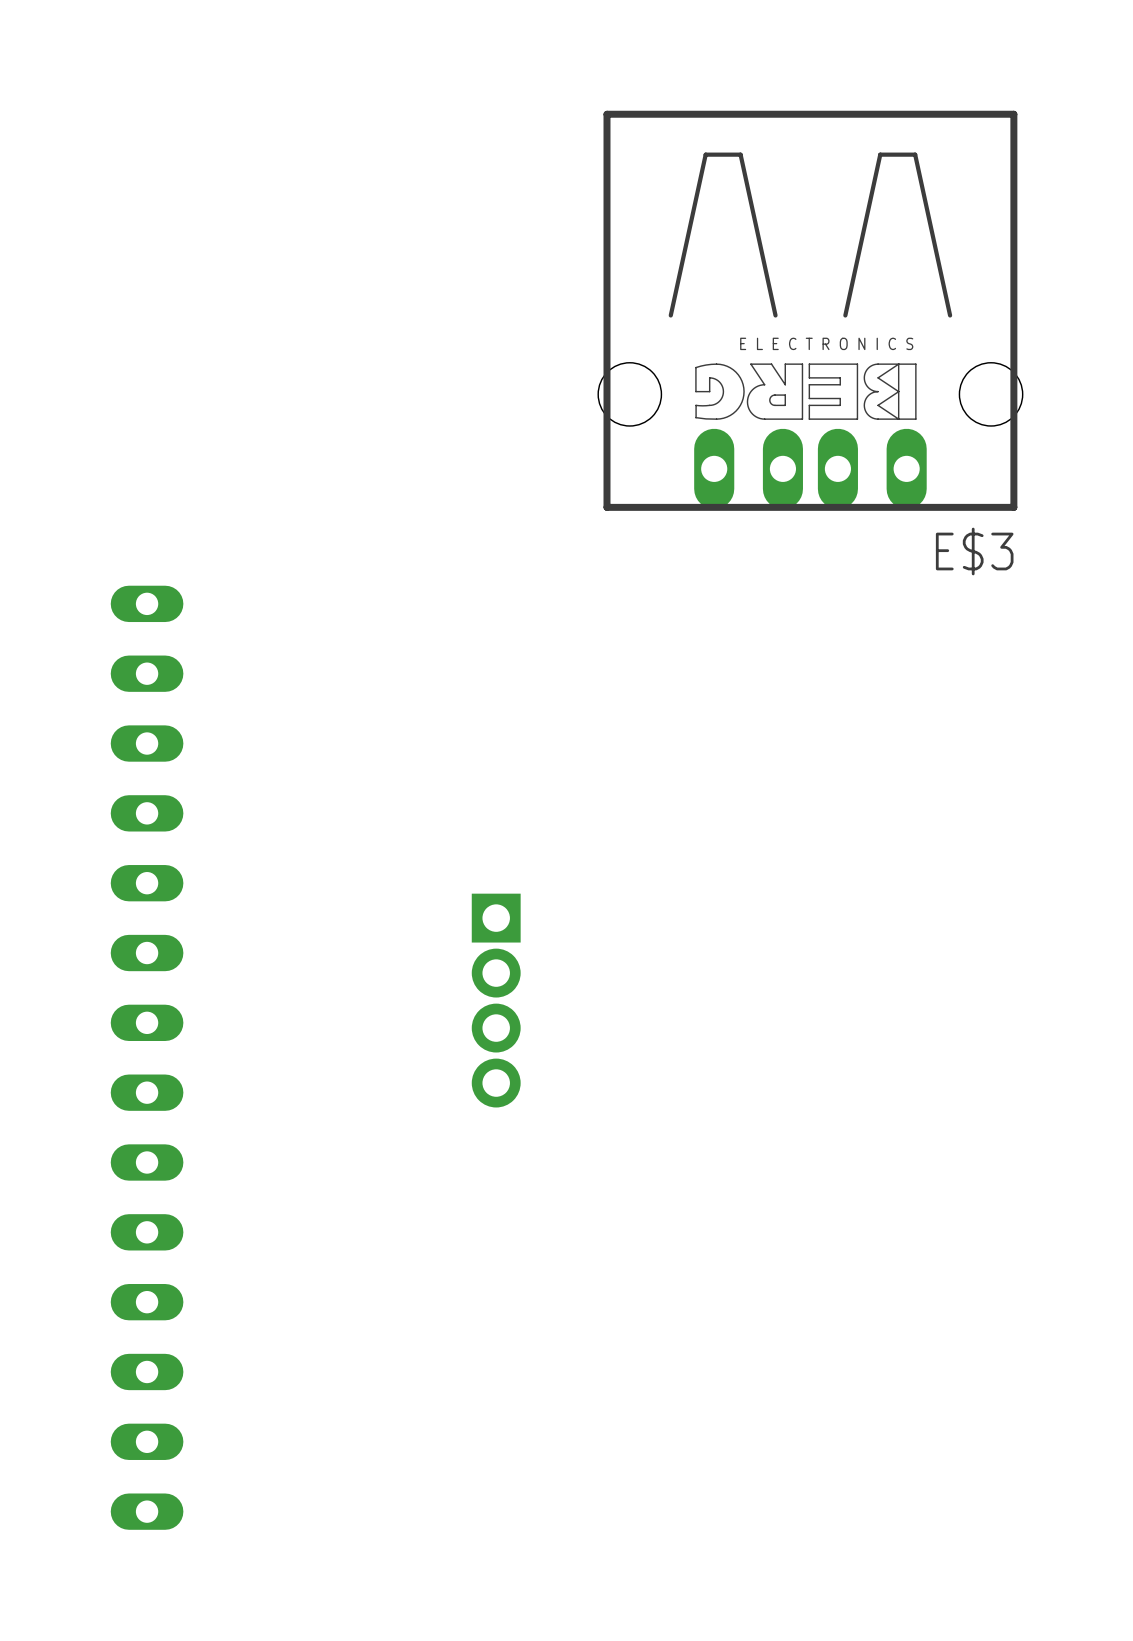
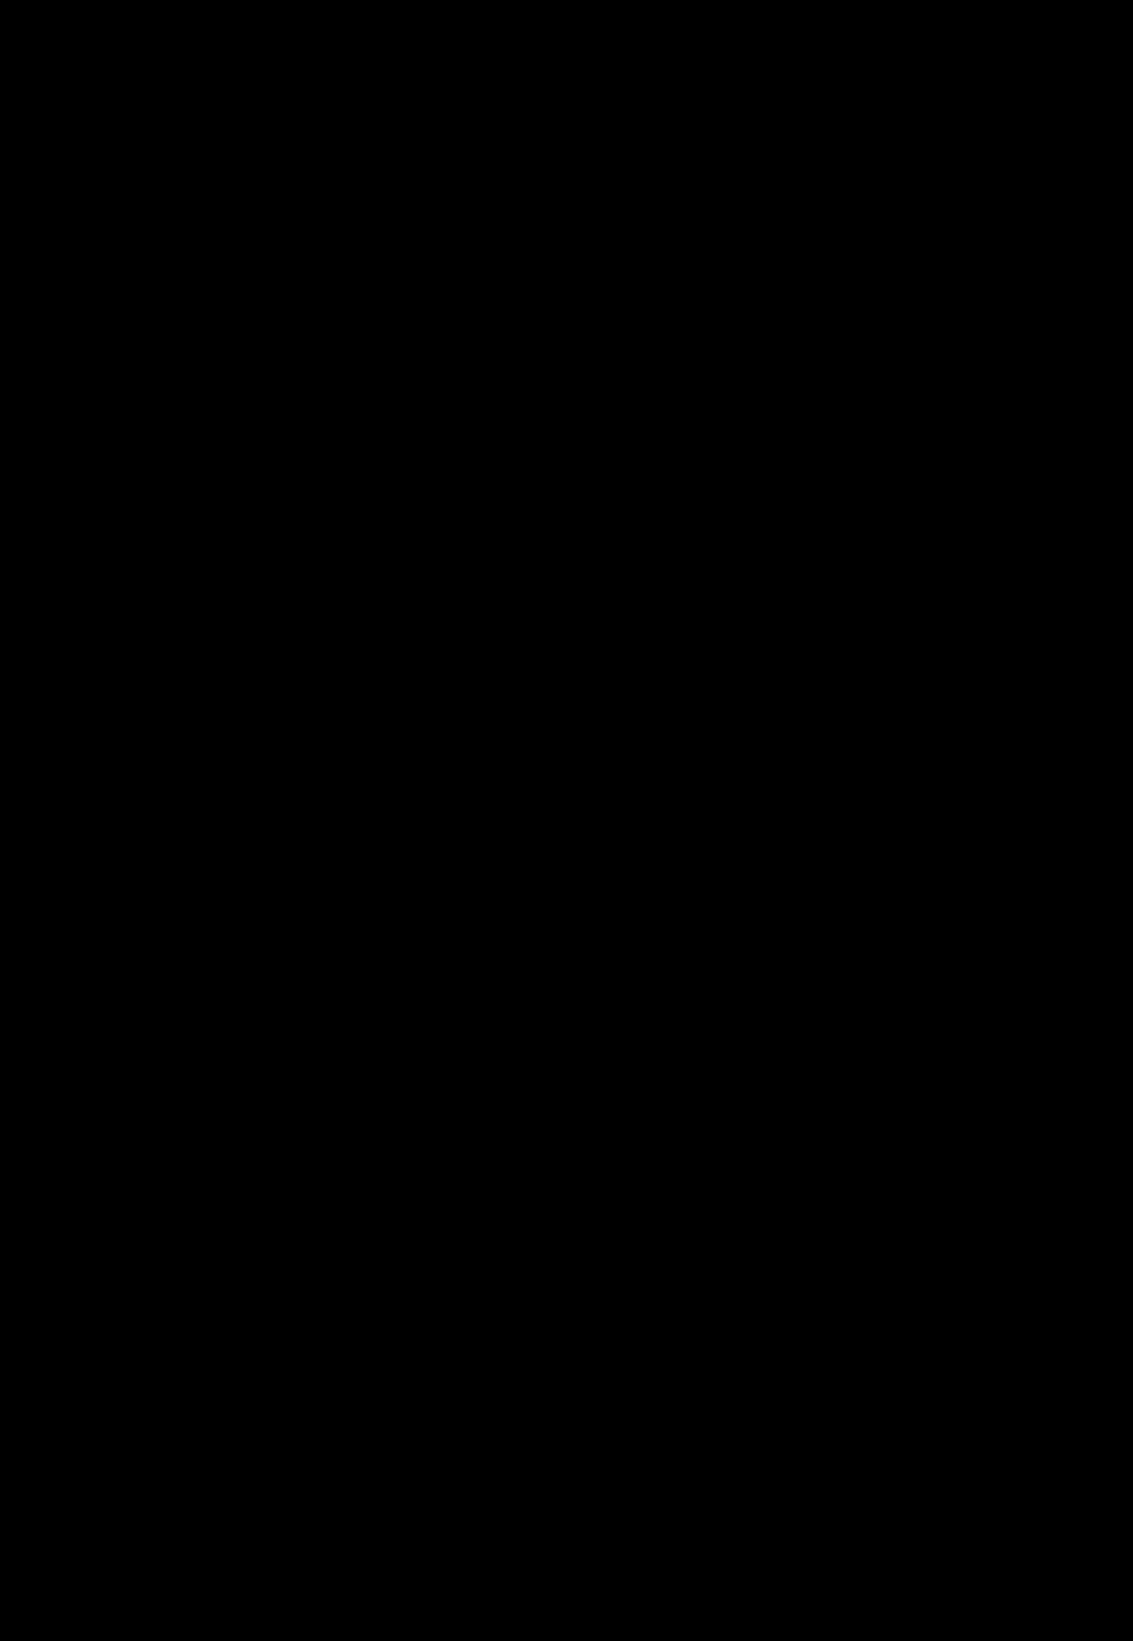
E$3: (810, 310) -> none
part: (496, 1000) -> none
part: (147, 1057) -> none

